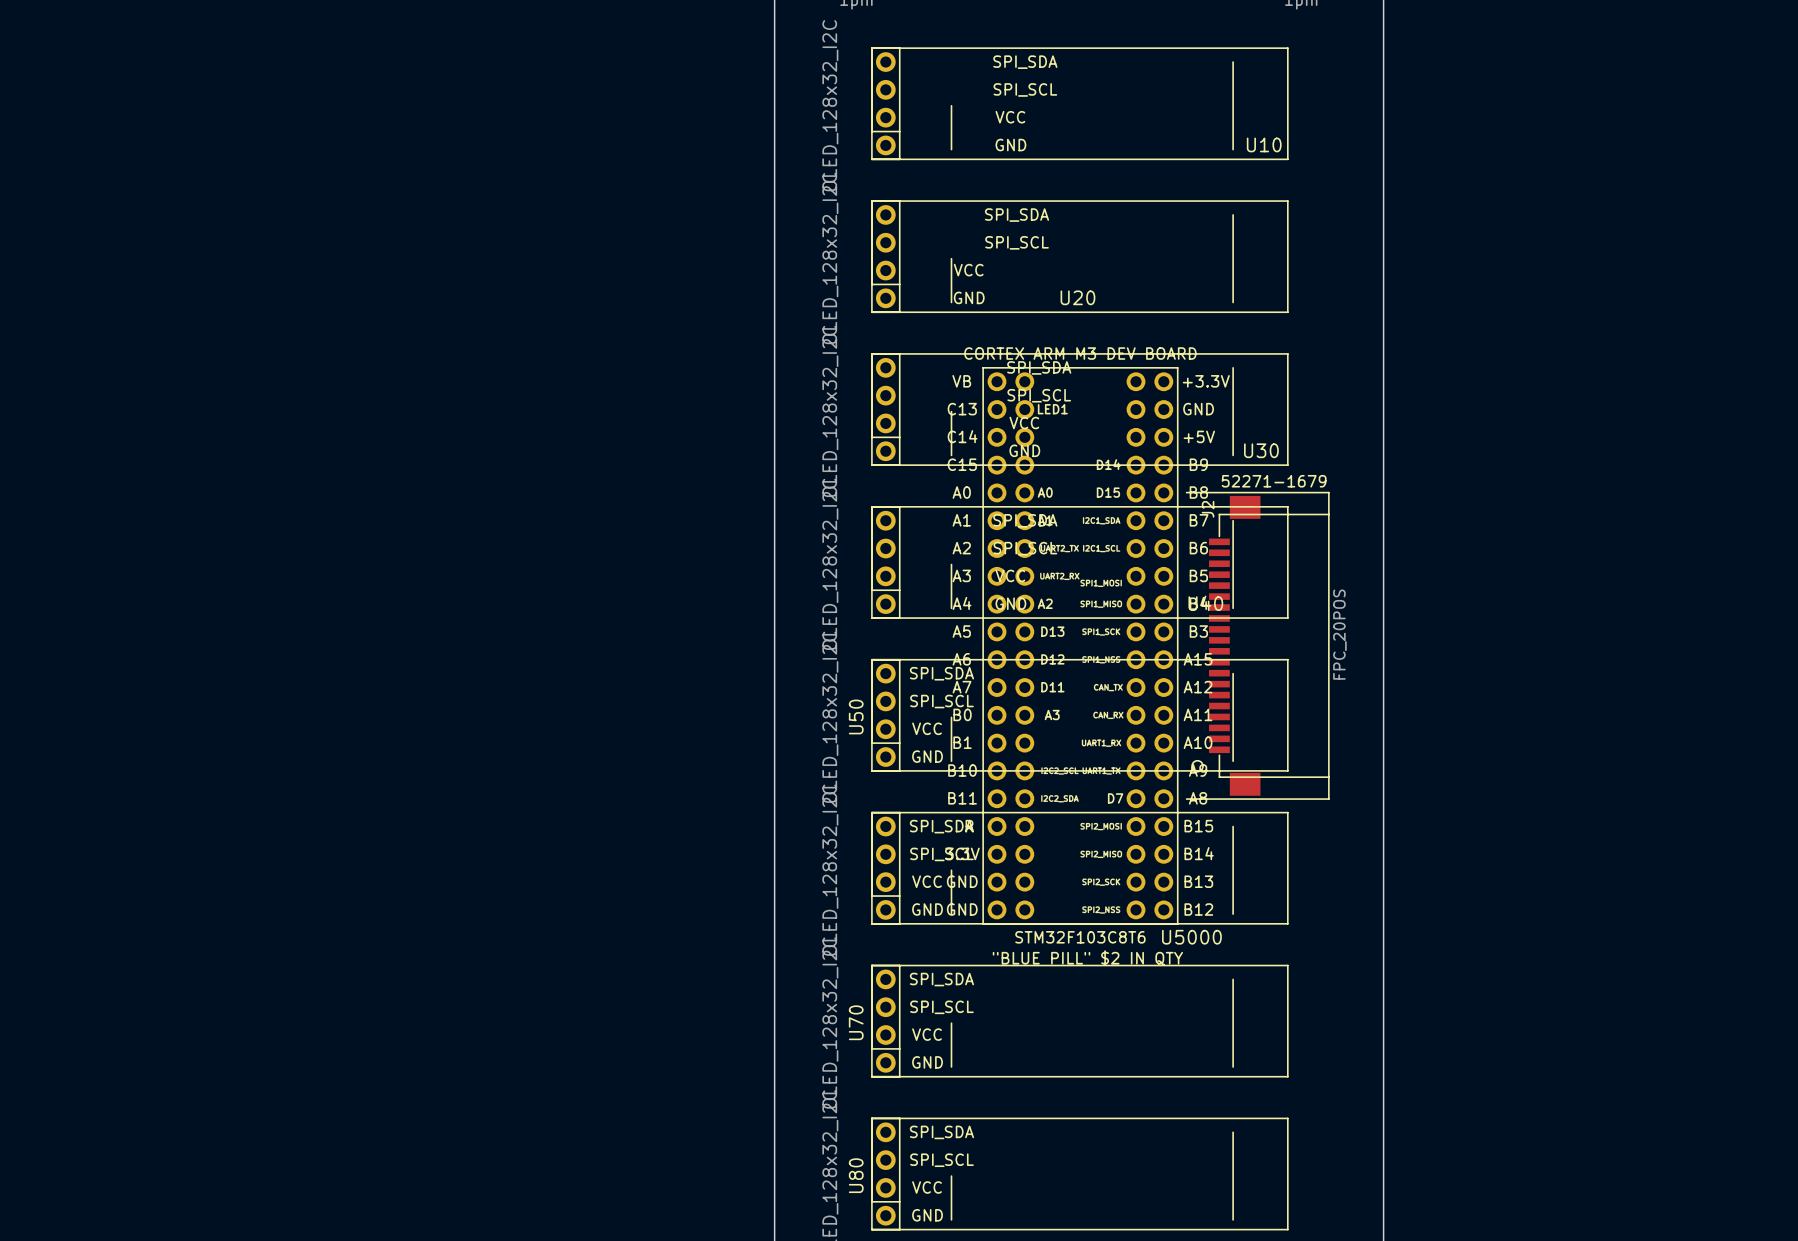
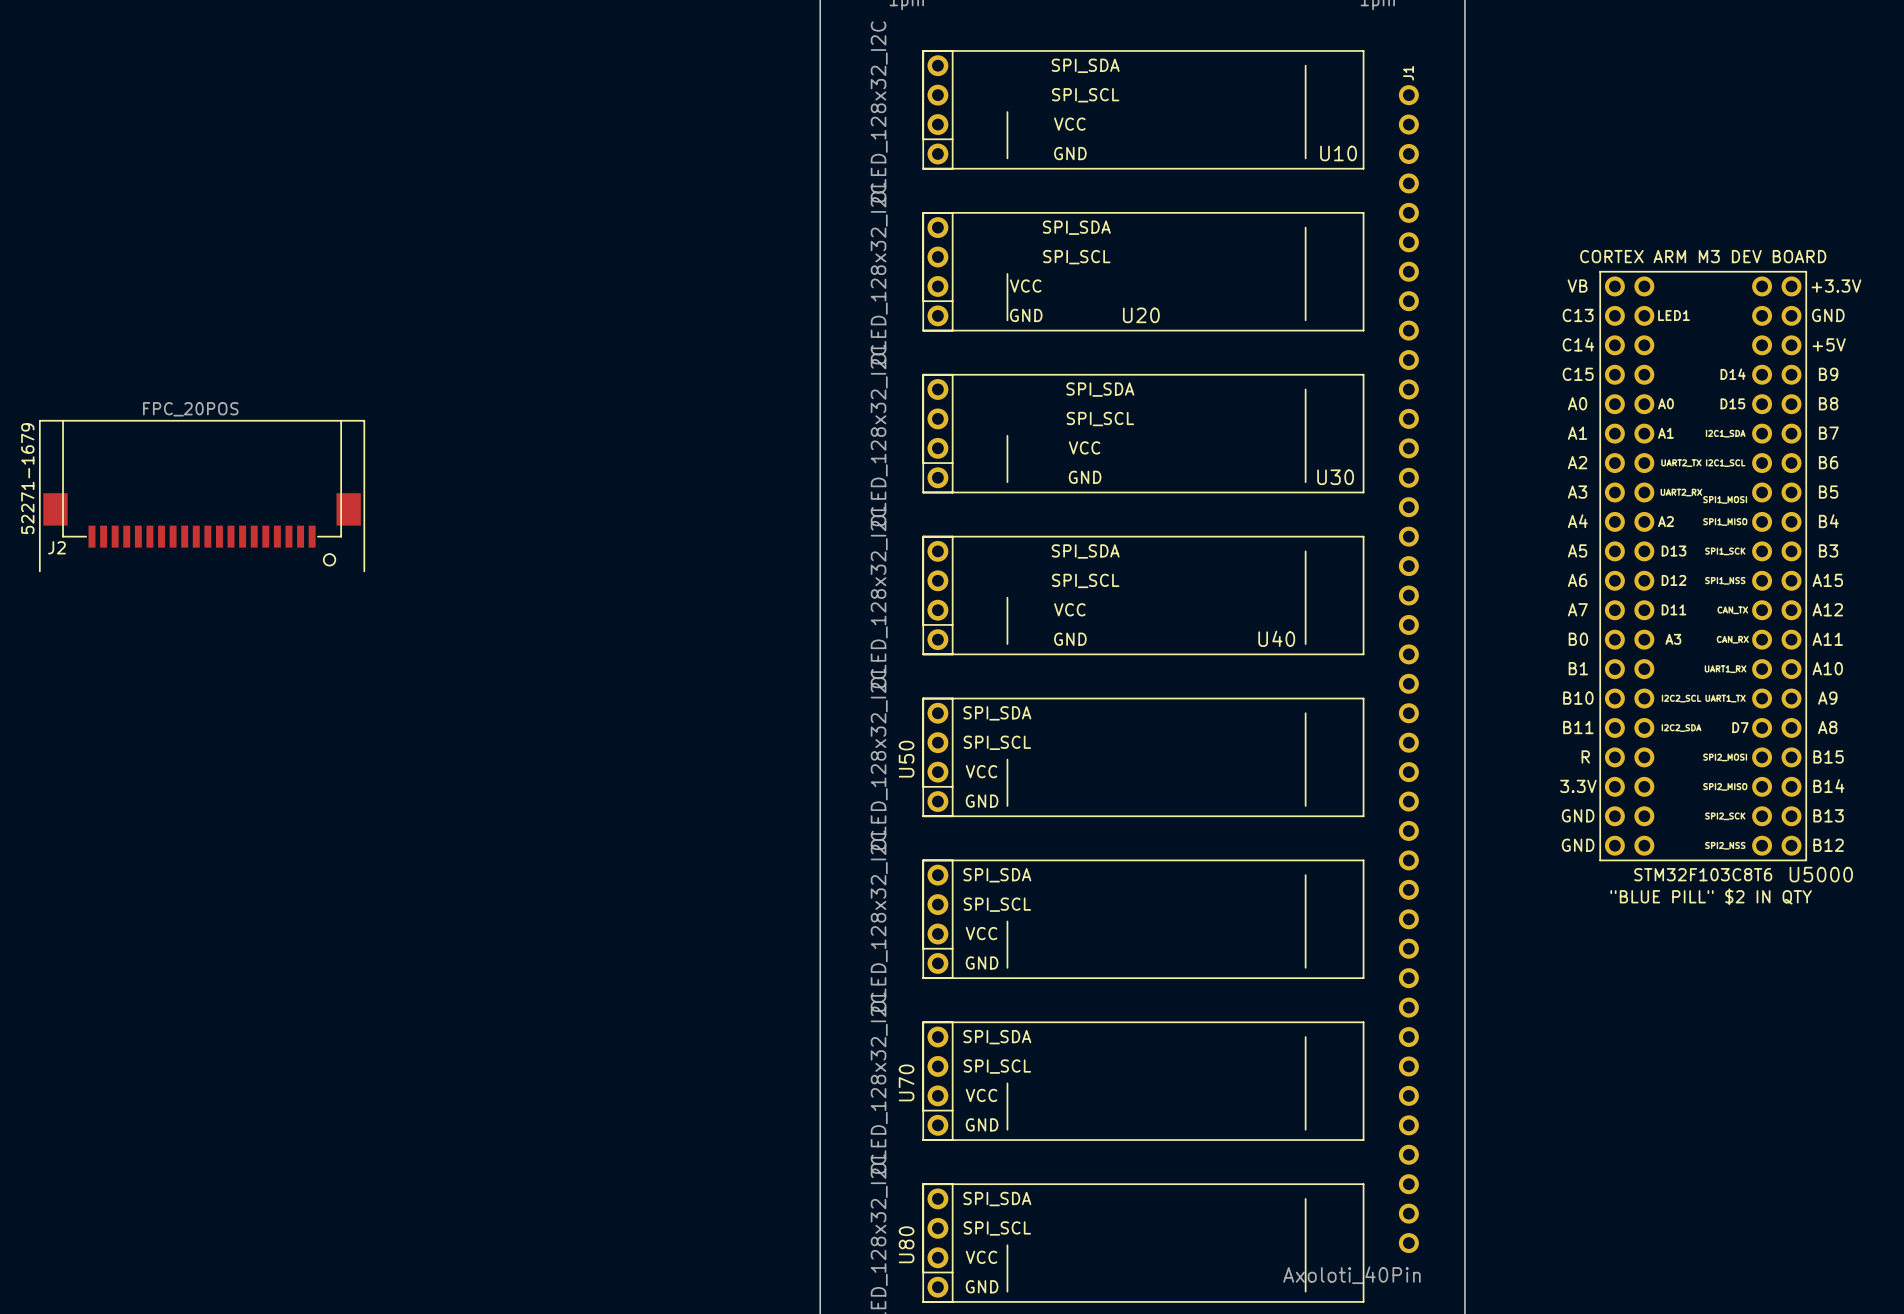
J1: none -> Axoloti_40Pin (1408, 669)
U5000 position: (1080, 645) -> (1703, 566)
J2 rotation: 0° (1257, 645) -> 90° counterclockwise (202, 496)
J2 position: (1257, 645) -> (202, 496)

